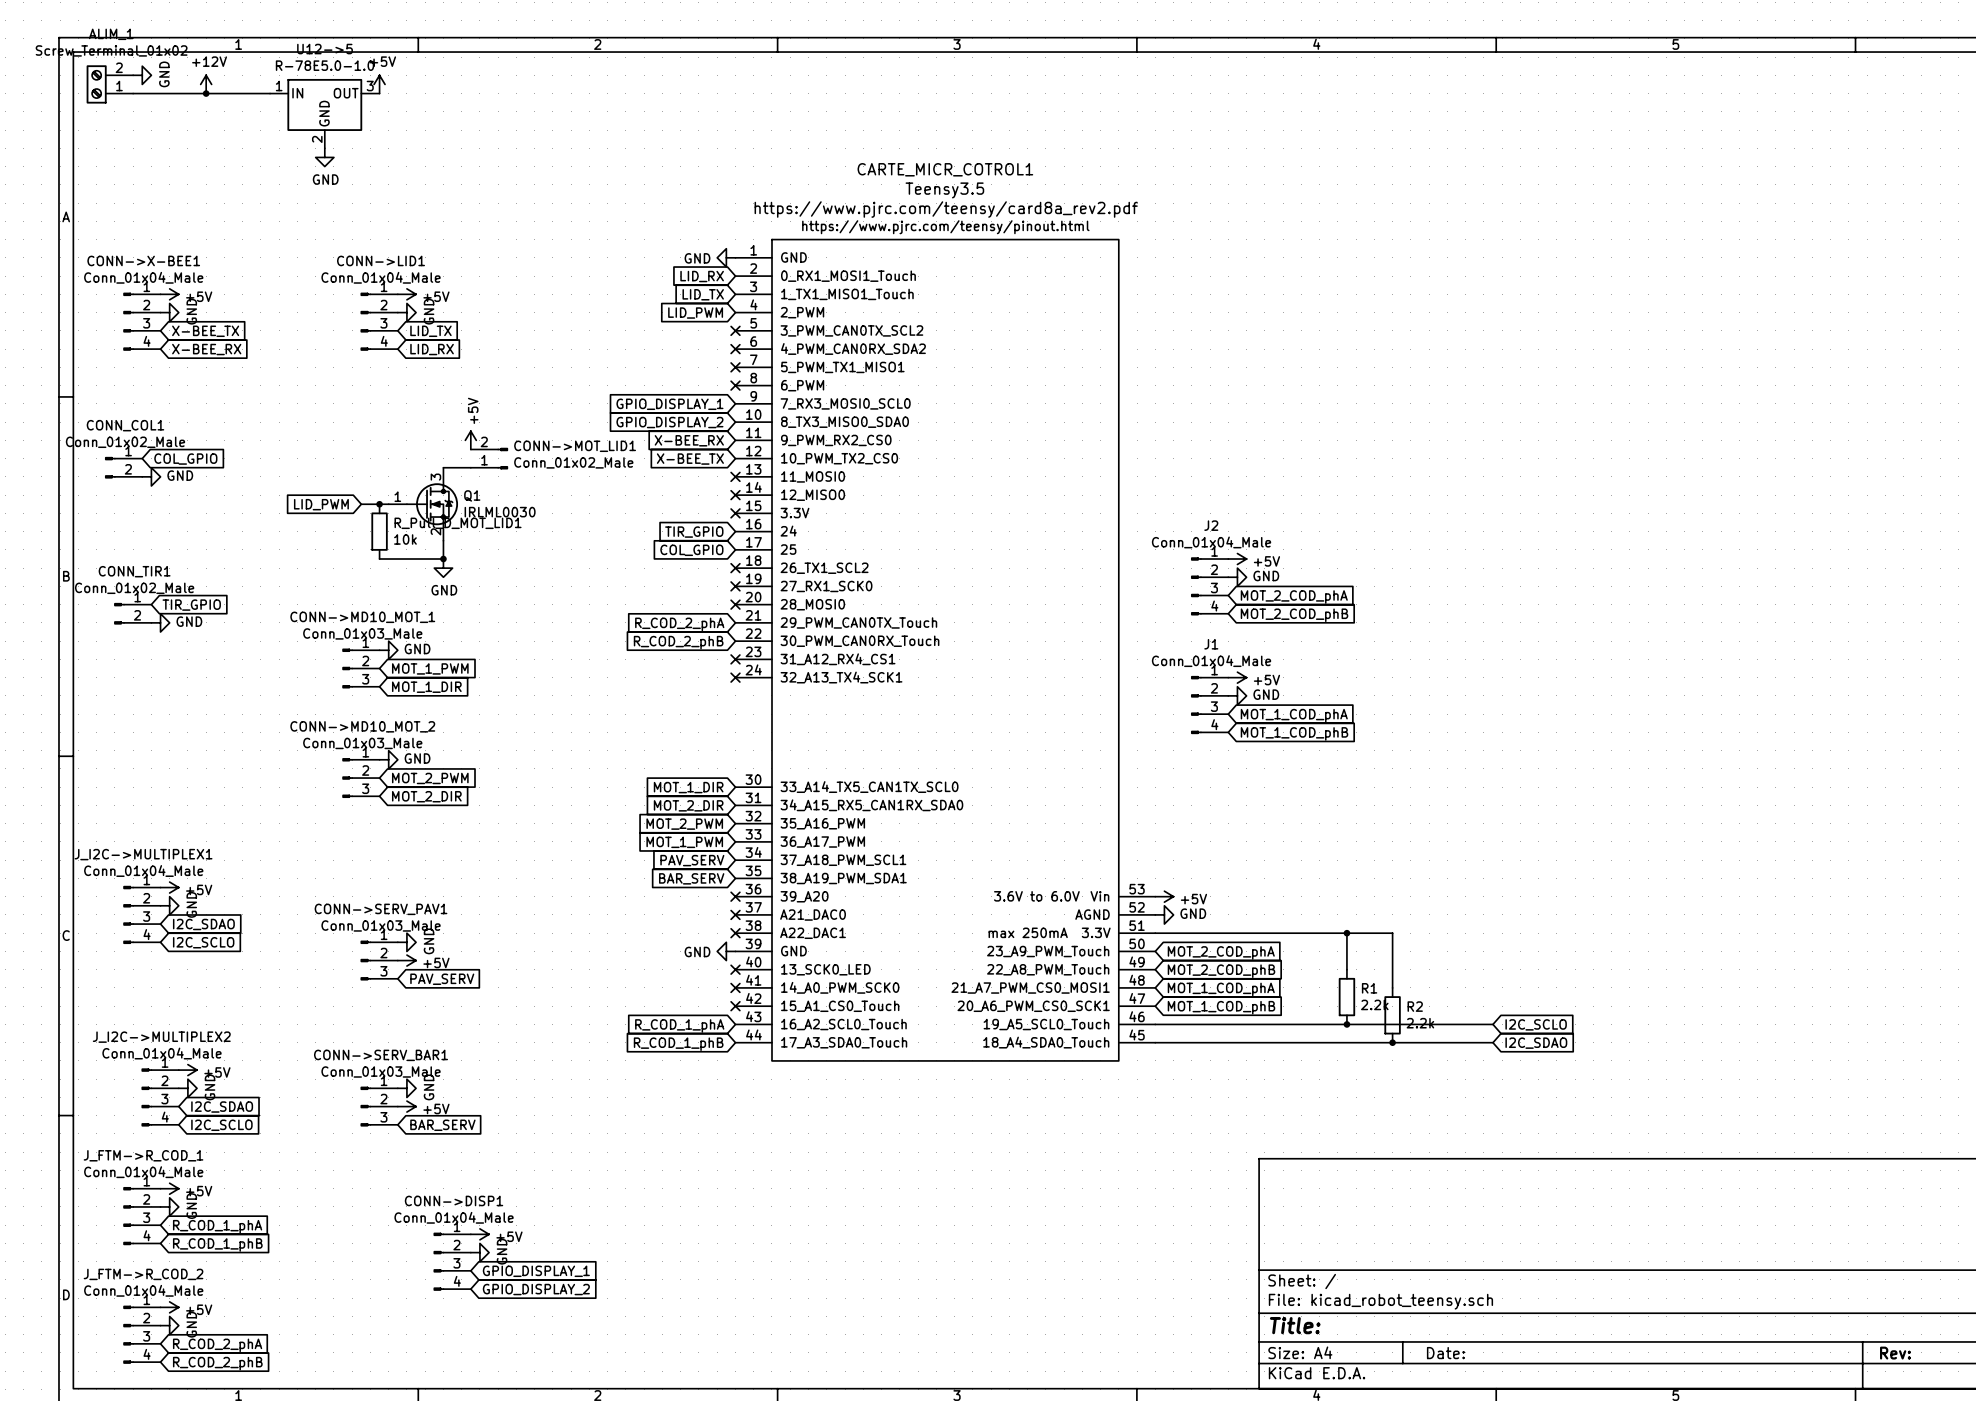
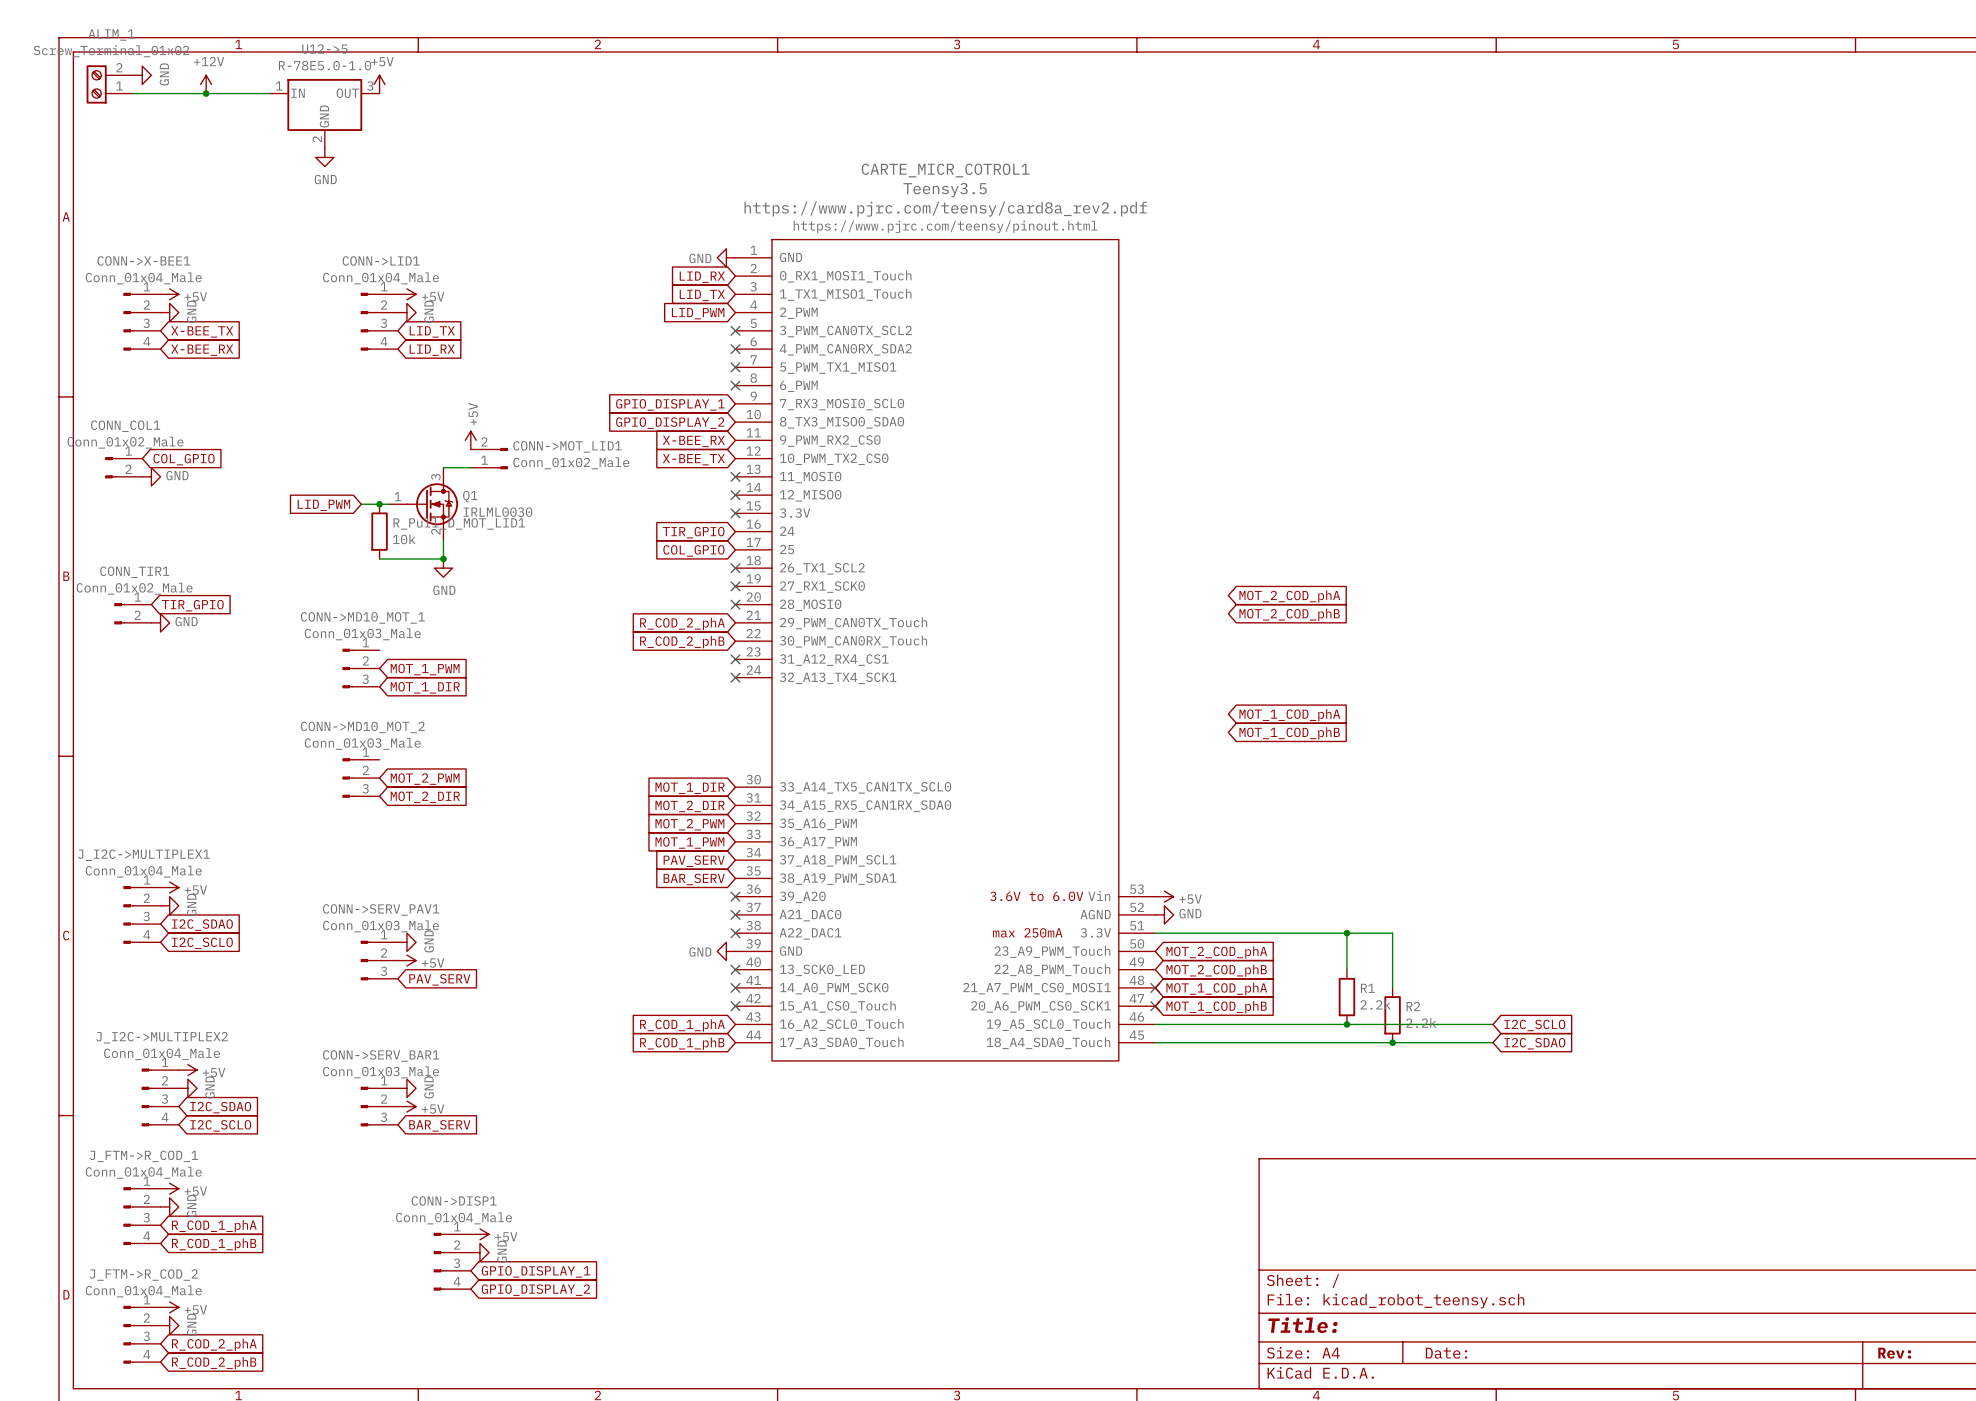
power symbol: +5V (1237, 559) -> none
power symbol: GND (1237, 577) -> none
J2: Conn_01x04_Male (1209, 586) -> none
power symbol: GND (388, 650) -> none
power symbol: +5V (1237, 677) -> none
power symbol: GND (1237, 695) -> none
J1: Conn_01x04_Male (1209, 705) -> none
power symbol: GND (388, 759) -> none
no-connect mark: none -> (1155, 987)
no-connect mark: none -> (1155, 1006)

